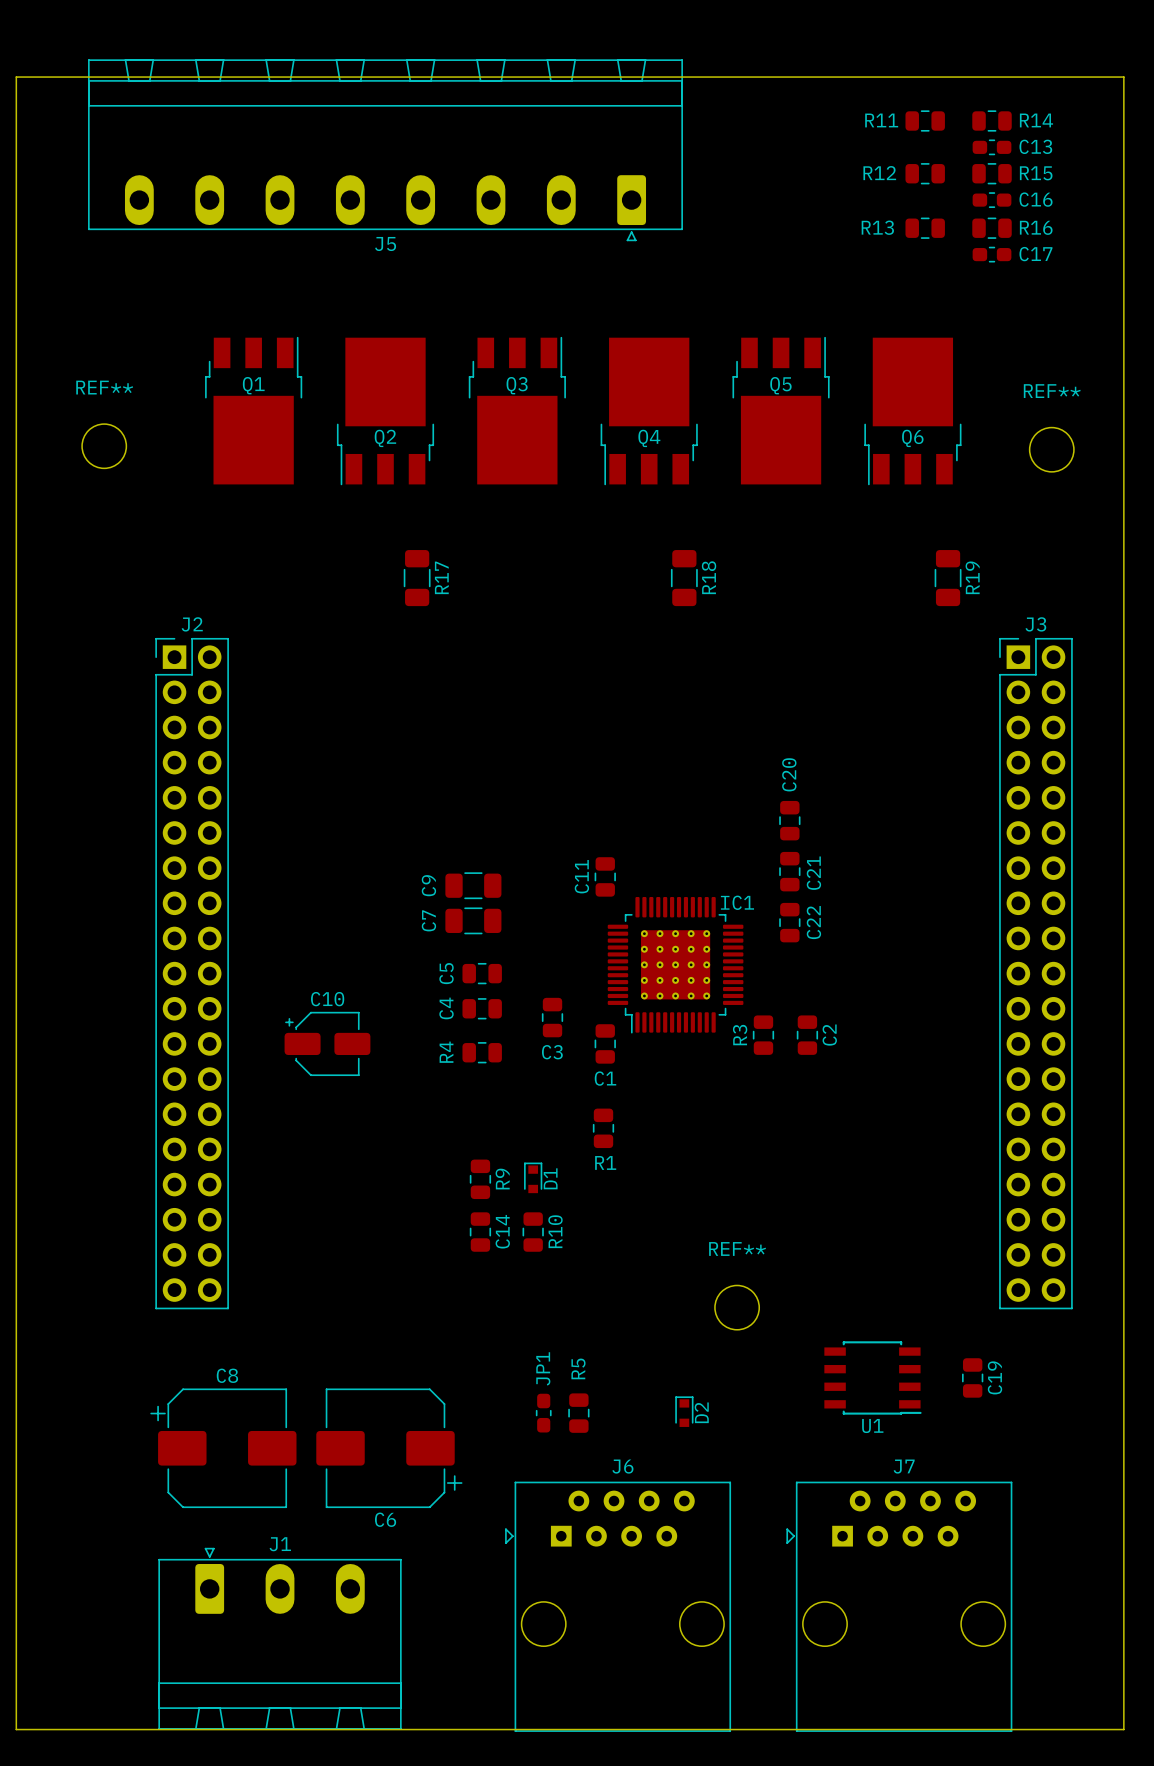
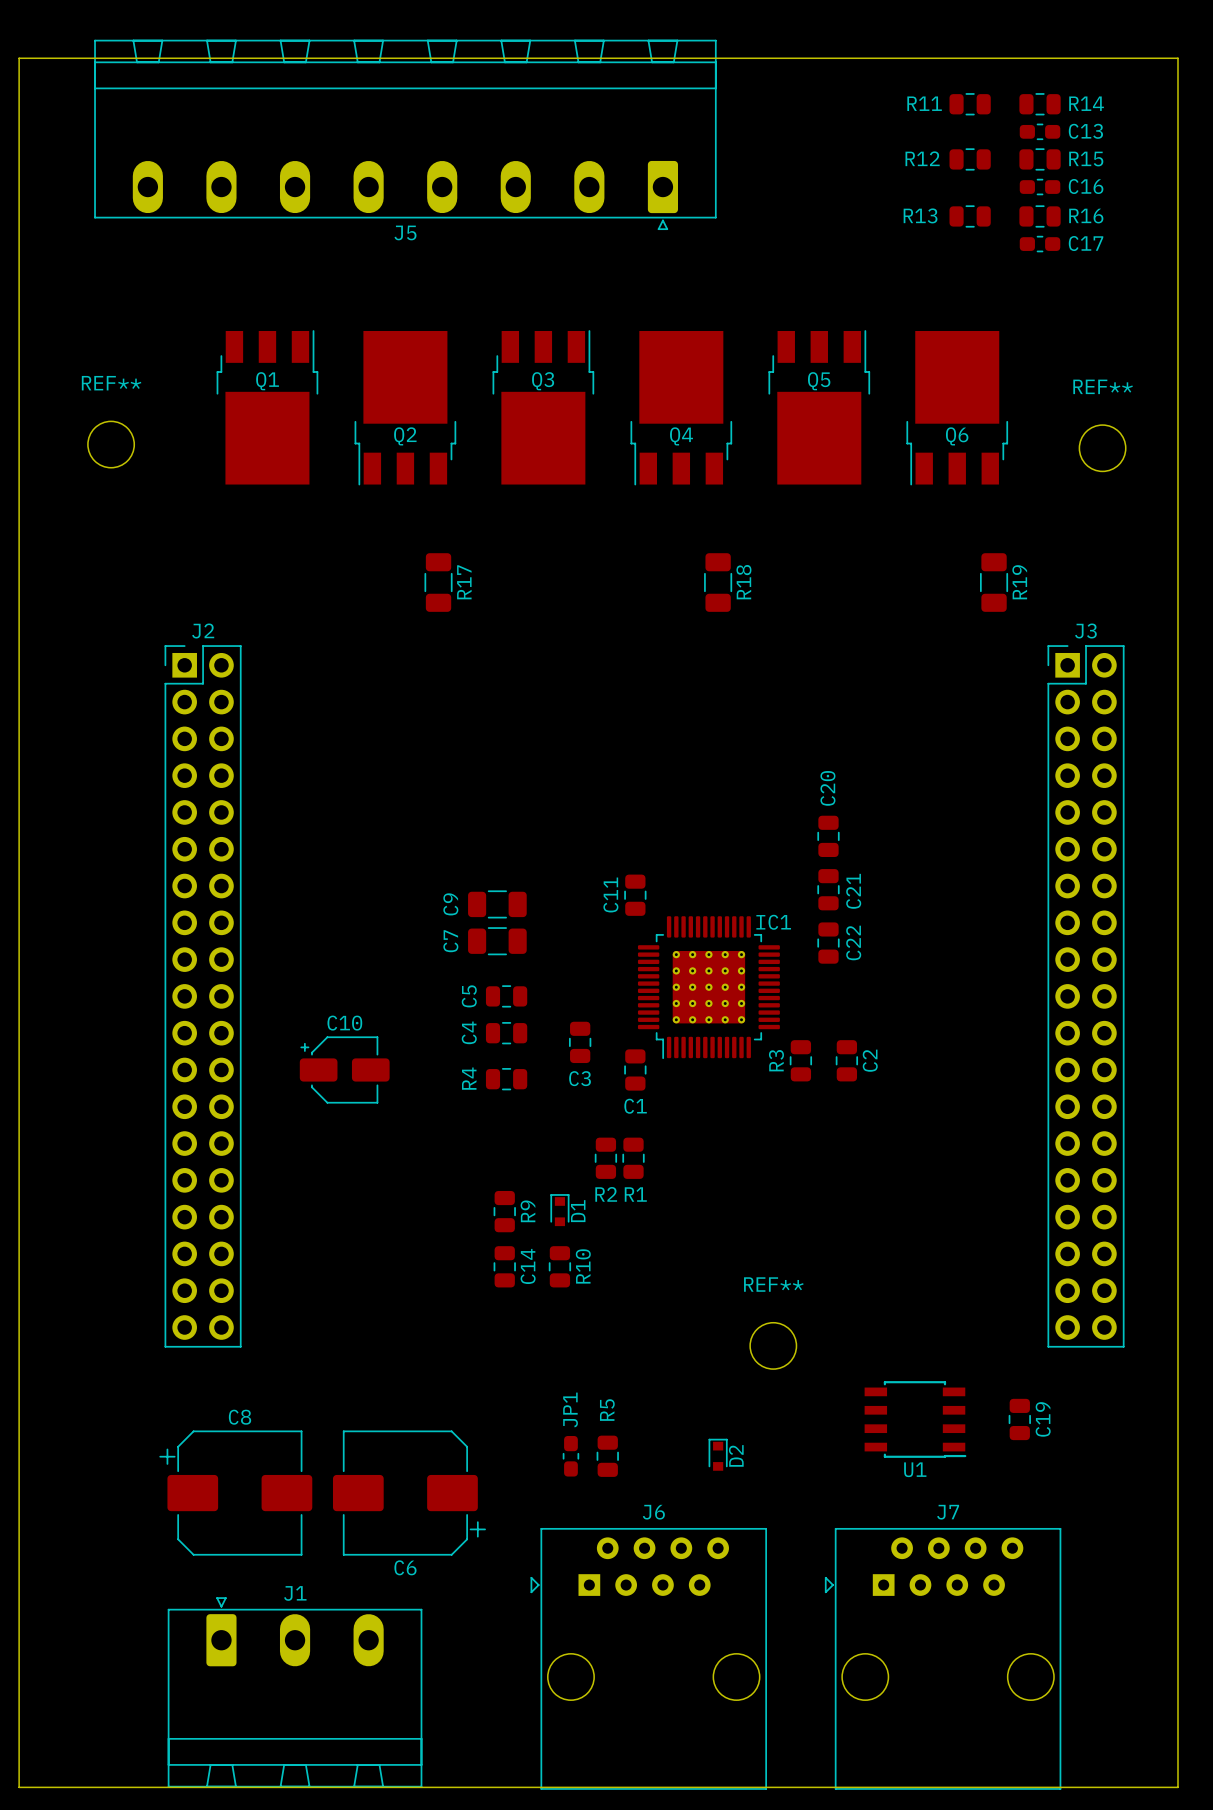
R2: none -> (605, 1158)

